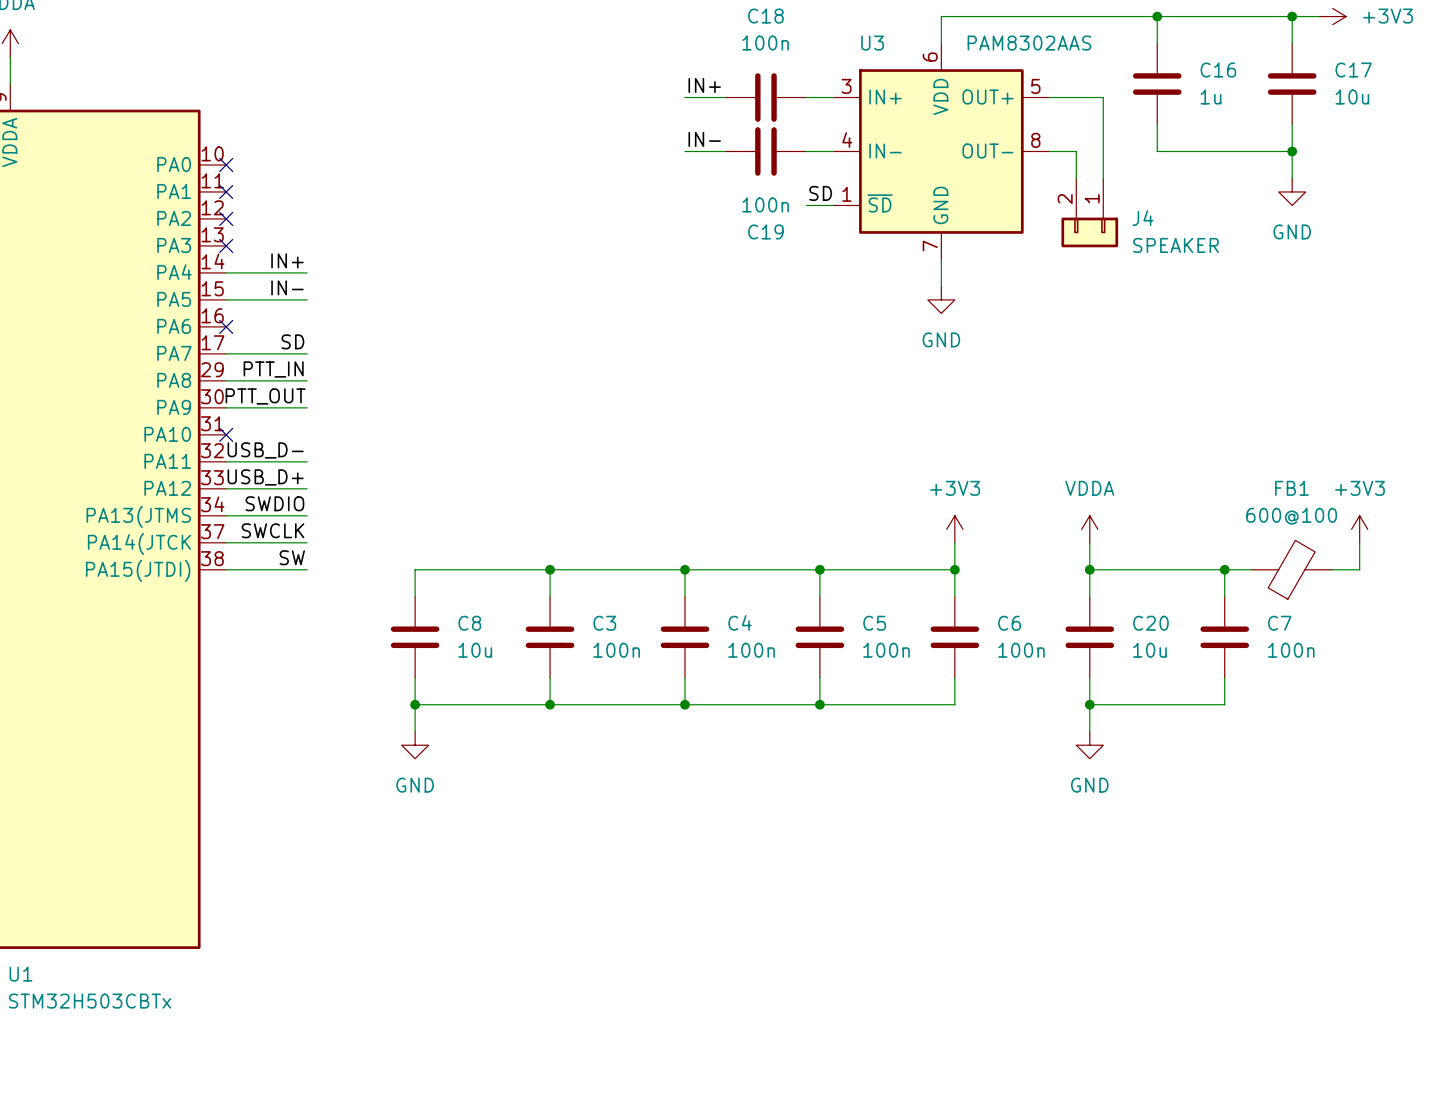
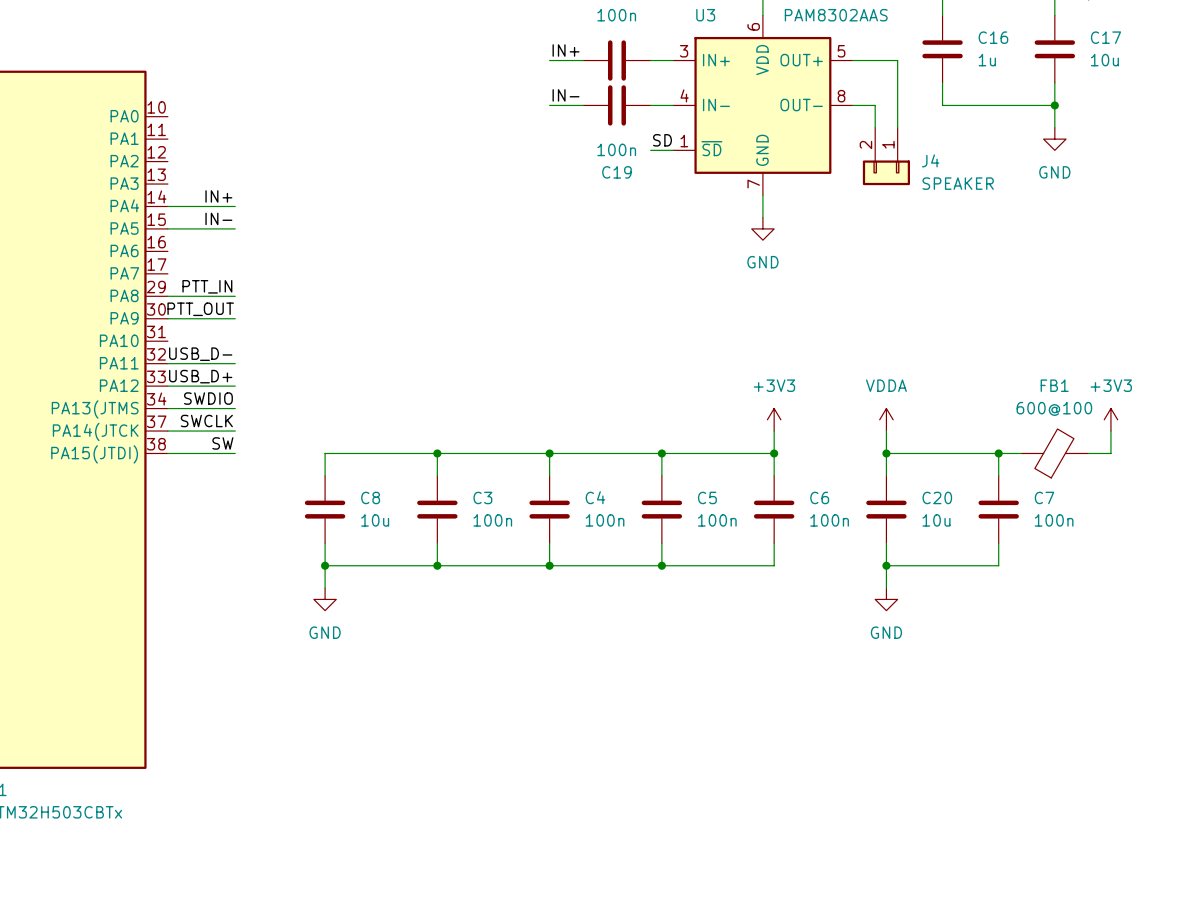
no-connect mark: (226, 164) -> none
no-connect mark: (226, 191) -> none
no-connect mark: (226, 218) -> none
no-connect mark: (226, 245) -> none
no-connect mark: (226, 326) -> none
label: SD (292, 341) -> none
wire: (226, 353) (307, 353) -> none
no-connect mark: (226, 434) -> none

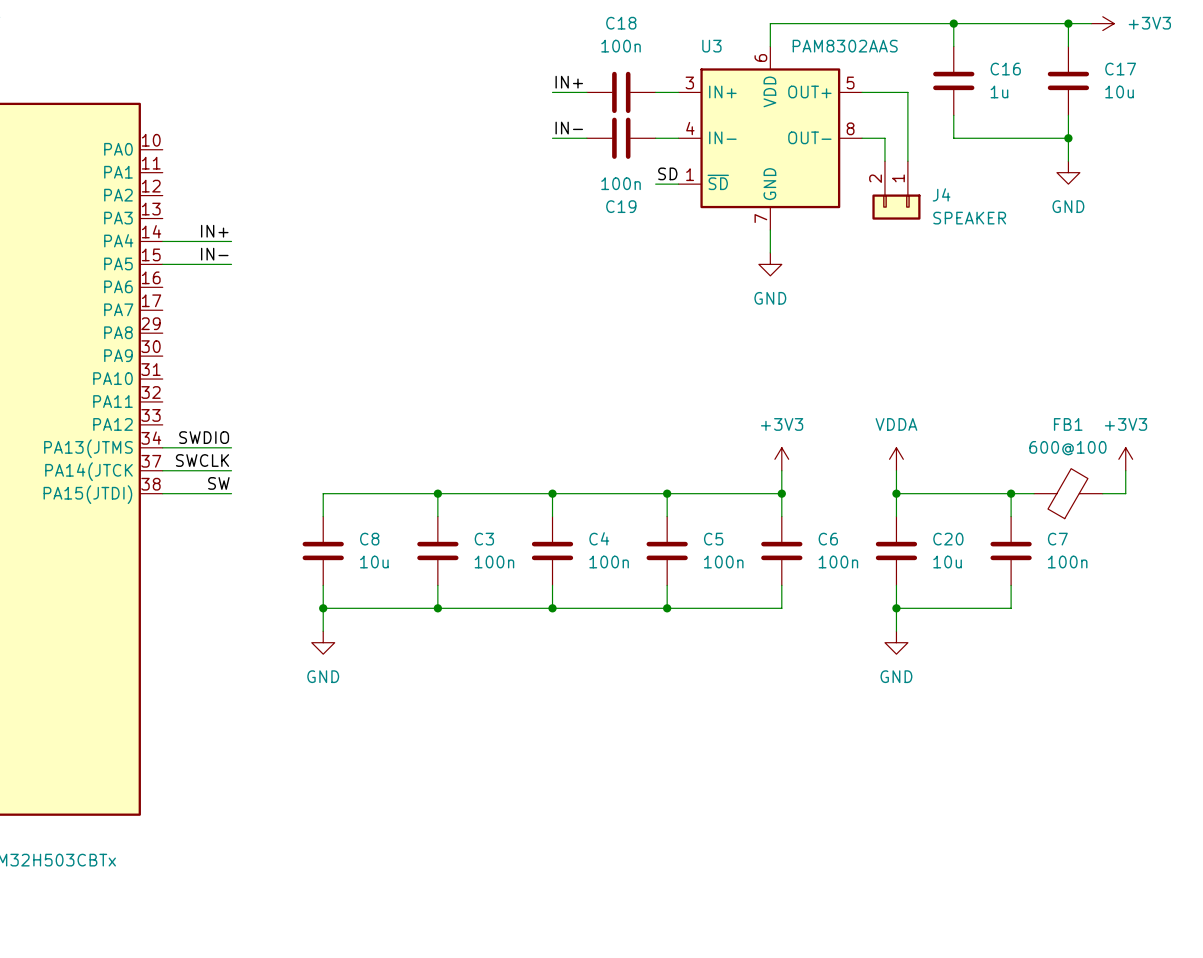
label: PTT_IN (207, 286) -> none
wire: (167, 296) (235, 296) -> none
label: PTT_OUT (200, 309) -> none
wire: (167, 318) (235, 318) -> none
label: USB_D- (200, 354) -> none
wire: (167, 363) (235, 363) -> none
label: USB_D+ (200, 376) -> none
wire: (167, 386) (235, 386) -> none

